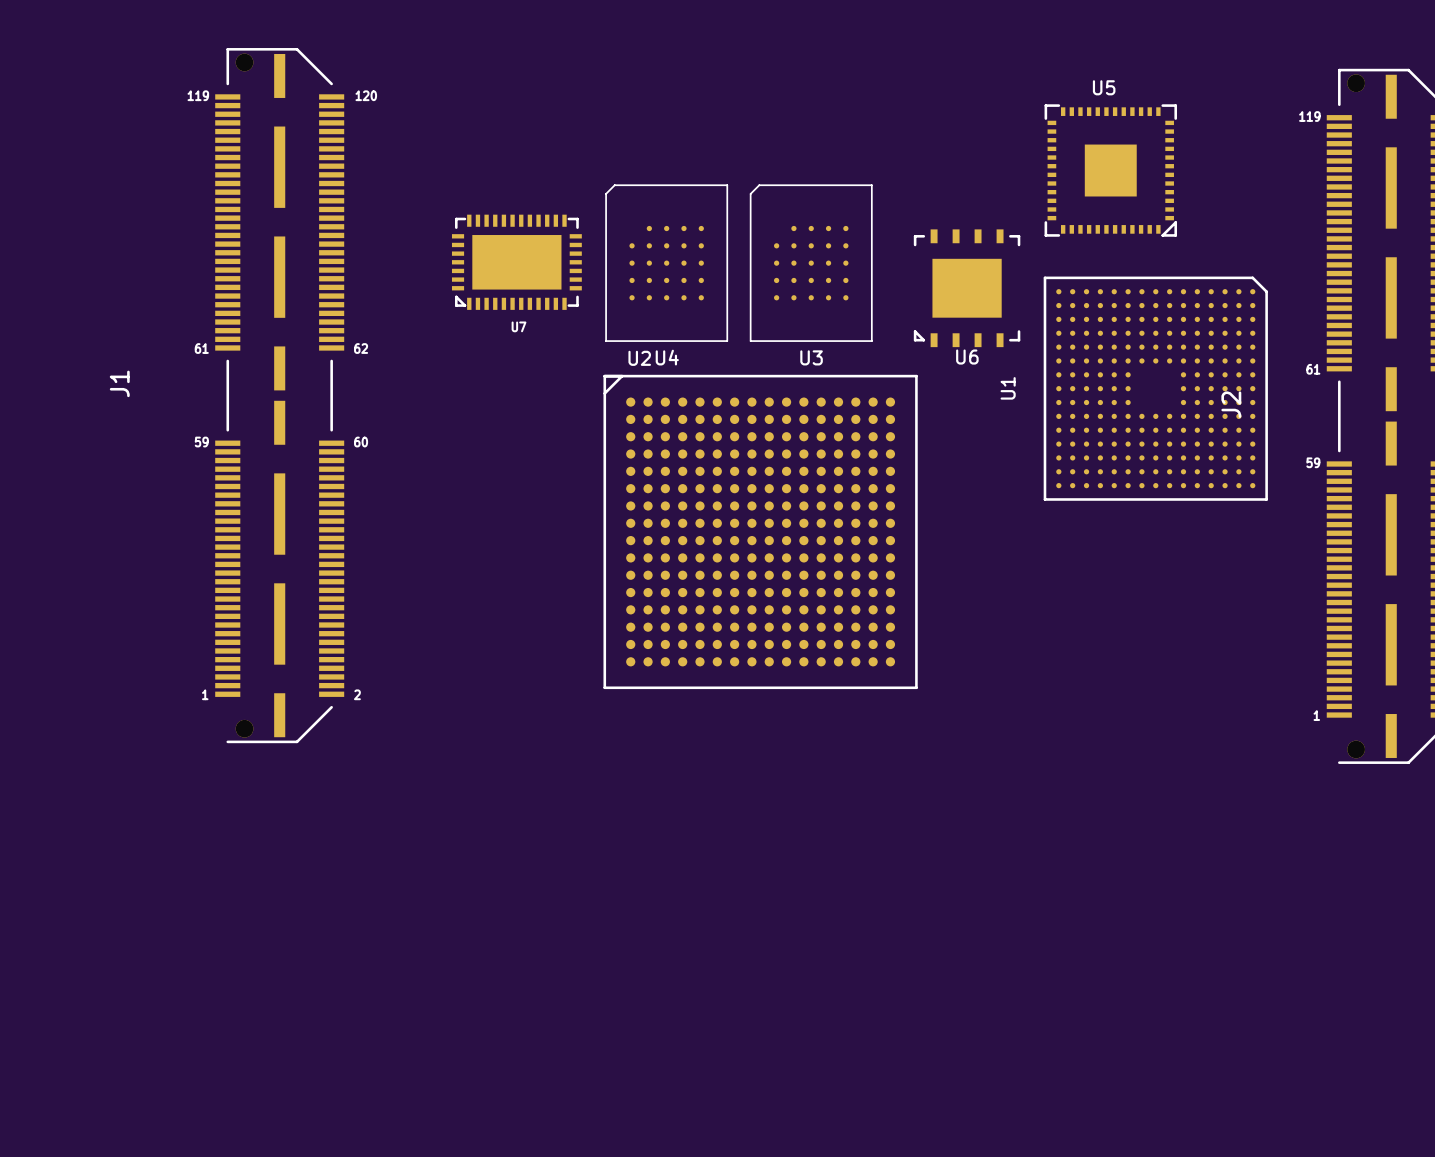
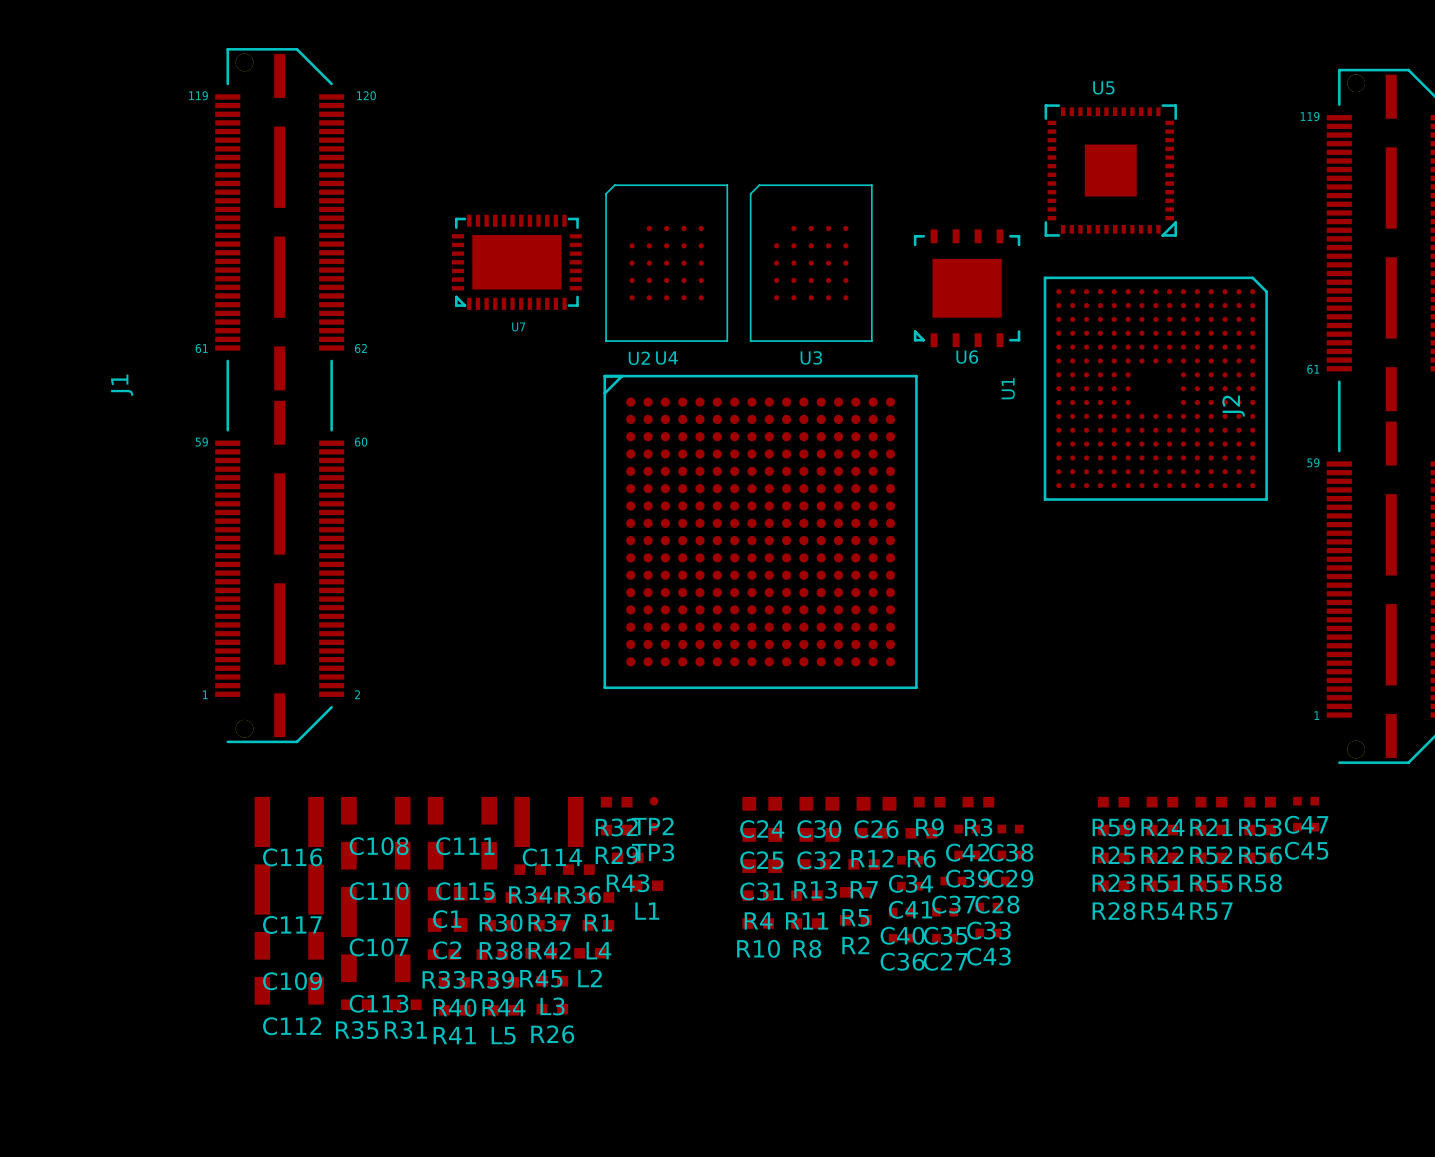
TP2: none -> (654, 801)
C47: none -> (1306, 801)
R32: none -> (616, 802)
R9: none -> (929, 802)
R3: none -> (978, 802)
R59: none -> (1113, 802)
R24: none -> (1162, 802)
R21: none -> (1211, 802)
R53: none -> (1260, 802)
C24: none -> (762, 803)
C30: none -> (819, 803)
C26: none -> (876, 803)
C108: none -> (375, 810)
C111: none -> (462, 810)
C116: none -> (289, 821)
C114: none -> (548, 821)
TP3: none -> (654, 827)
C45: none -> (1306, 827)
C42: none -> (967, 829)
C38: none -> (1010, 829)
R29: none -> (616, 830)
R25: none -> (1113, 830)
R22: none -> (1162, 830)
R52: none -> (1211, 830)
R56: none -> (1260, 830)
R12: none -> (872, 833)
R6: none -> (921, 833)
C25: none -> (762, 834)
C32: none -> (819, 834)
C110: none -> (375, 855)
C115: none -> (462, 855)
C39: none -> (967, 855)
C29: none -> (1010, 855)
R43: none -> (627, 857)
R23: none -> (1113, 857)
R51: none -> (1162, 857)
R55: none -> (1211, 857)
R58: none -> (1260, 857)
C34: none -> (910, 860)
R13: none -> (815, 864)
R7: none -> (864, 864)
C31: none -> (762, 866)
R34: none -> (530, 869)
R36: none -> (578, 869)
C37: none -> (953, 881)
C28: none -> (996, 881)
L1: none -> (647, 885)
R28: none -> (1113, 885)
R54: none -> (1162, 885)
R57: none -> (1211, 885)
C41: none -> (910, 886)
C117: none -> (289, 889)
R5: none -> (855, 892)
C1: none -> (447, 893)
R4: none -> (758, 895)
R11: none -> (806, 895)
R30: none -> (500, 897)
R37: none -> (549, 897)
R1: none -> (598, 897)
C33: none -> (988, 906)
C107: none -> (375, 911)
C40: none -> (901, 912)
C35: none -> (945, 912)
R2: none -> (855, 920)
R10: none -> (758, 923)
R8: none -> (806, 923)
C2: none -> (447, 924)
R38: none -> (500, 925)
R42: none -> (549, 925)
L4: none -> (598, 925)
C43: none -> (988, 932)
C36: none -> (901, 938)
C27: none -> (945, 938)
C109: none -> (289, 945)
R45: none -> (541, 953)
L2: none -> (590, 953)
R33: none -> (443, 954)
R39: none -> (492, 954)
C113: none -> (375, 968)
L3: none -> (552, 981)
R40: none -> (454, 982)
R44: none -> (503, 982)
C112: none -> (289, 990)
R35: none -> (356, 1004)
R31: none -> (405, 1004)
R26: none -> (552, 1009)
R41: none -> (454, 1010)
L5: none -> (503, 1010)

